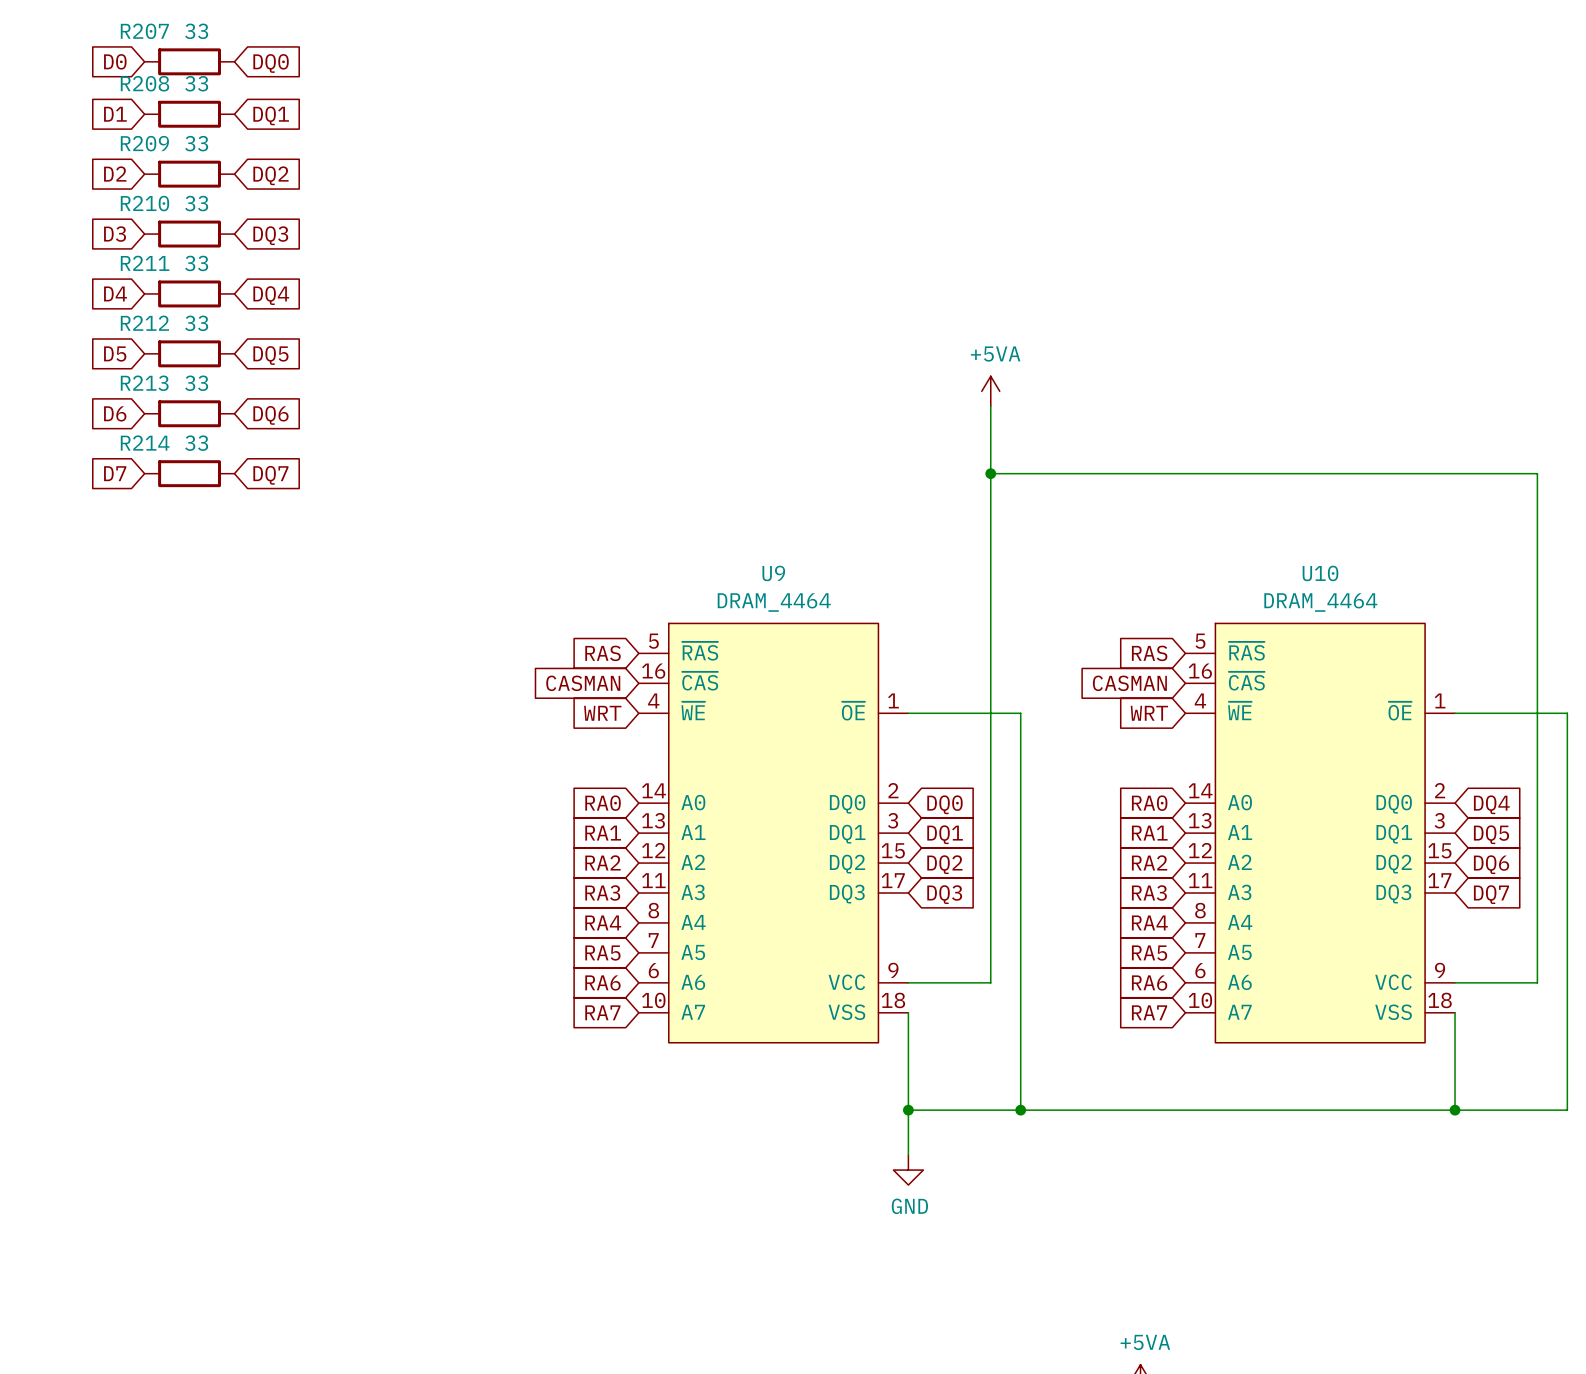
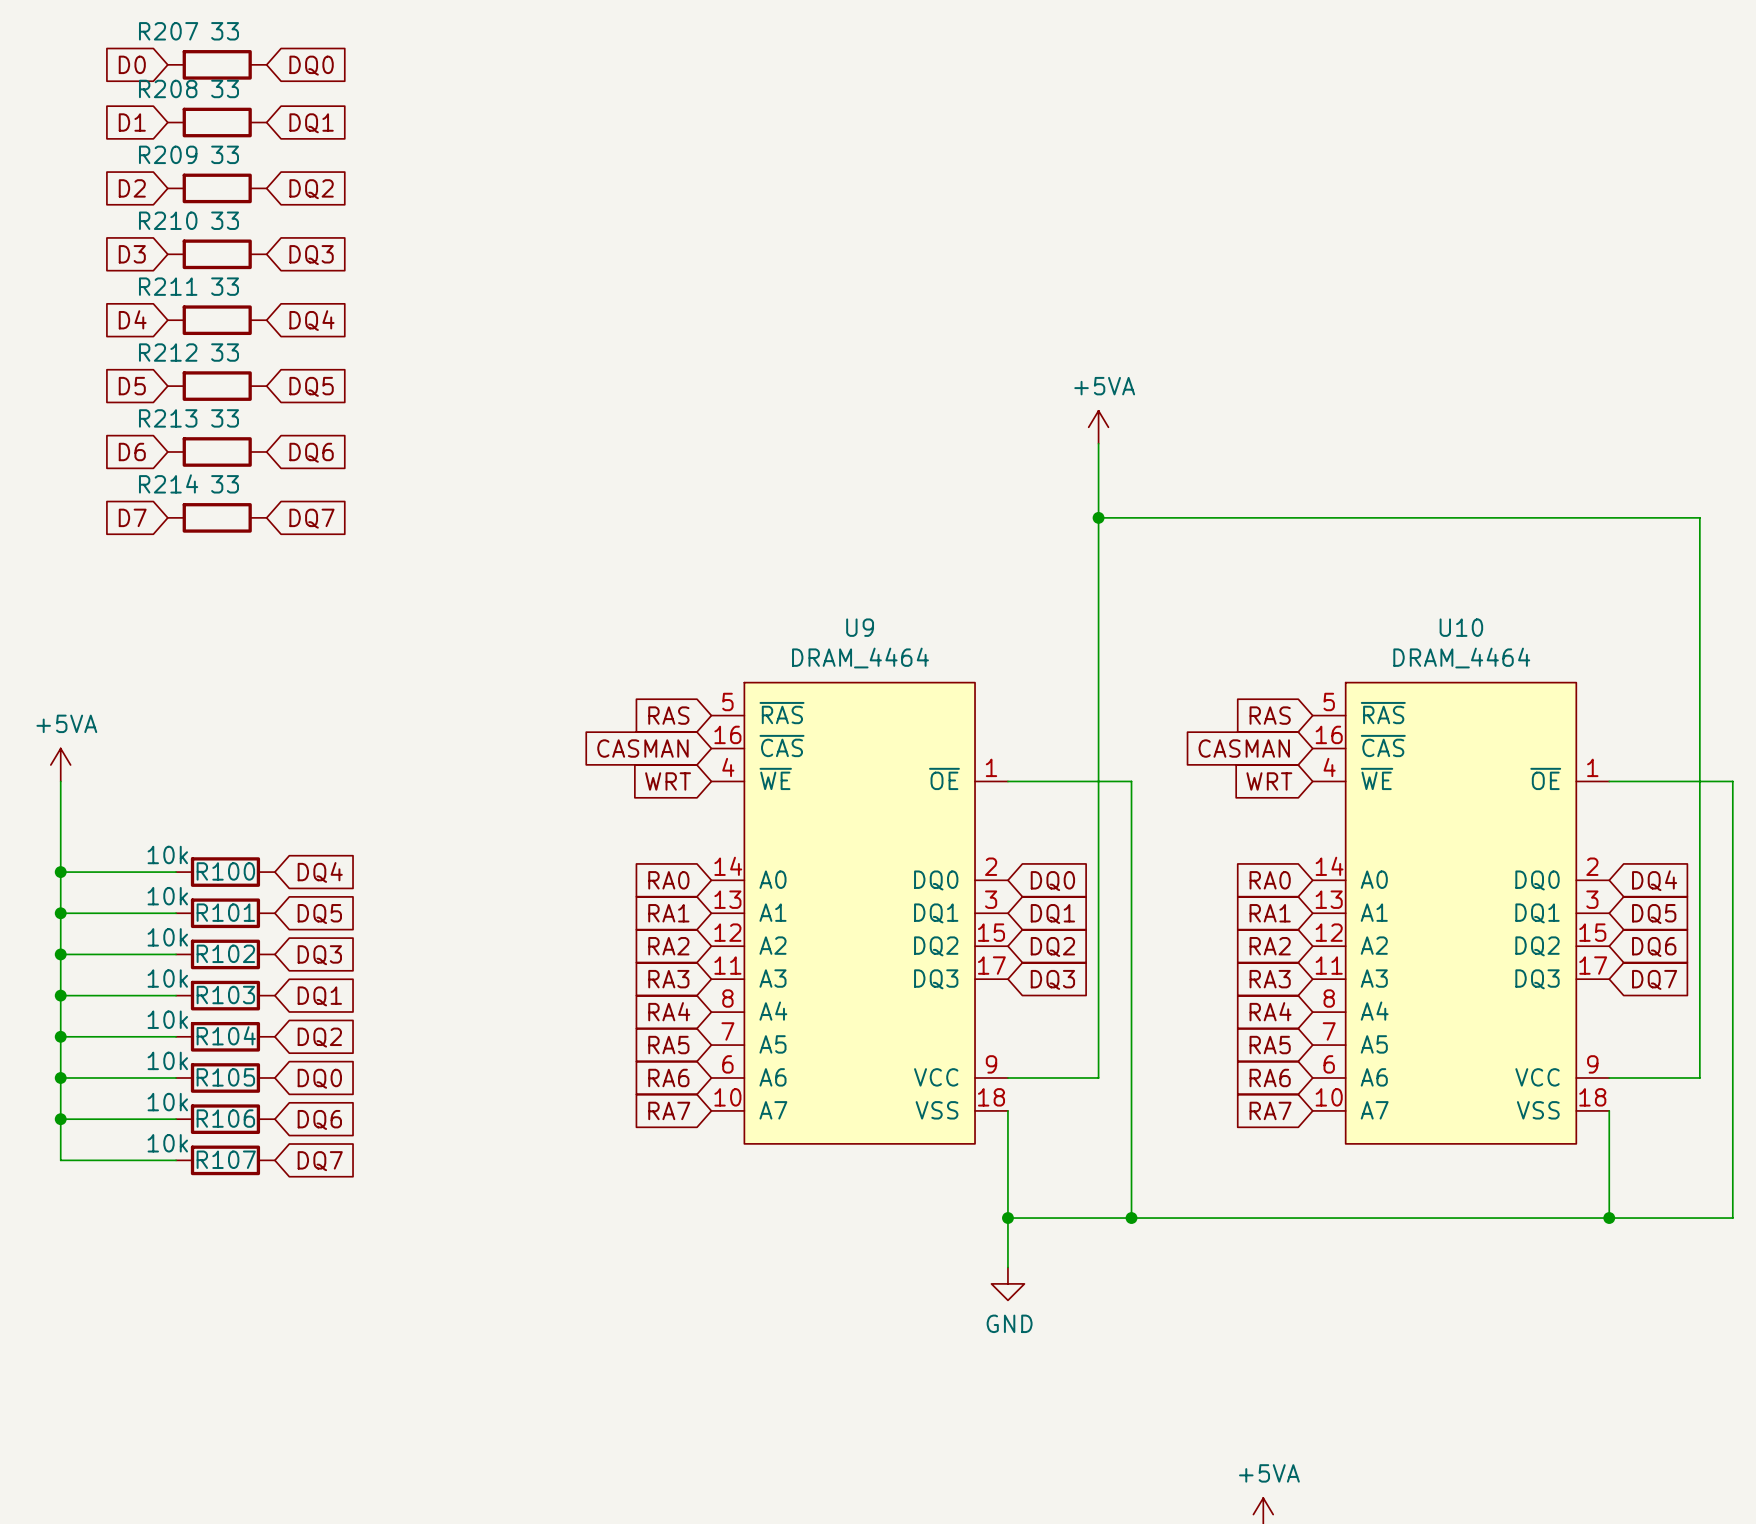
power symbol: none -> +5VA (60, 764)
wire: none -> (60, 781) (60, 1160) (176, 1160)
wire: none -> (60, 872) (176, 872)
junction: none -> (60, 872)
R100: none -> 10k (225, 872)
global label: none -> DQ4 (320, 872)
wire: none -> (60, 913) (176, 913)
junction: none -> (60, 913)
R101: none -> 10k (225, 913)
global label: none -> DQ5 (319, 914)
wire: none -> (60, 954) (176, 954)
junction: none -> (60, 954)
R102: none -> 10k (225, 954)
global label: none -> DQ3 (319, 955)
wire: none -> (60, 995) (176, 995)
junction: none -> (60, 995)
R103: none -> 10k (225, 995)
global label: none -> DQ1 (319, 996)
wire: none -> (60, 1036) (176, 1036)
junction: none -> (60, 1036)
R104: none -> 10k (225, 1036)
global label: none -> DQ2 (319, 1037)
wire: none -> (60, 1077) (176, 1077)
junction: none -> (60, 1077)
R105: none -> 10k (225, 1077)
global label: none -> DQ0 (319, 1078)
wire: none -> (60, 1119) (176, 1119)
junction: none -> (60, 1119)
R106: none -> 10k (225, 1119)
global label: none -> DQ6 (319, 1119)
R107: none -> 10k (225, 1160)
global label: none -> DQ7 (320, 1161)

